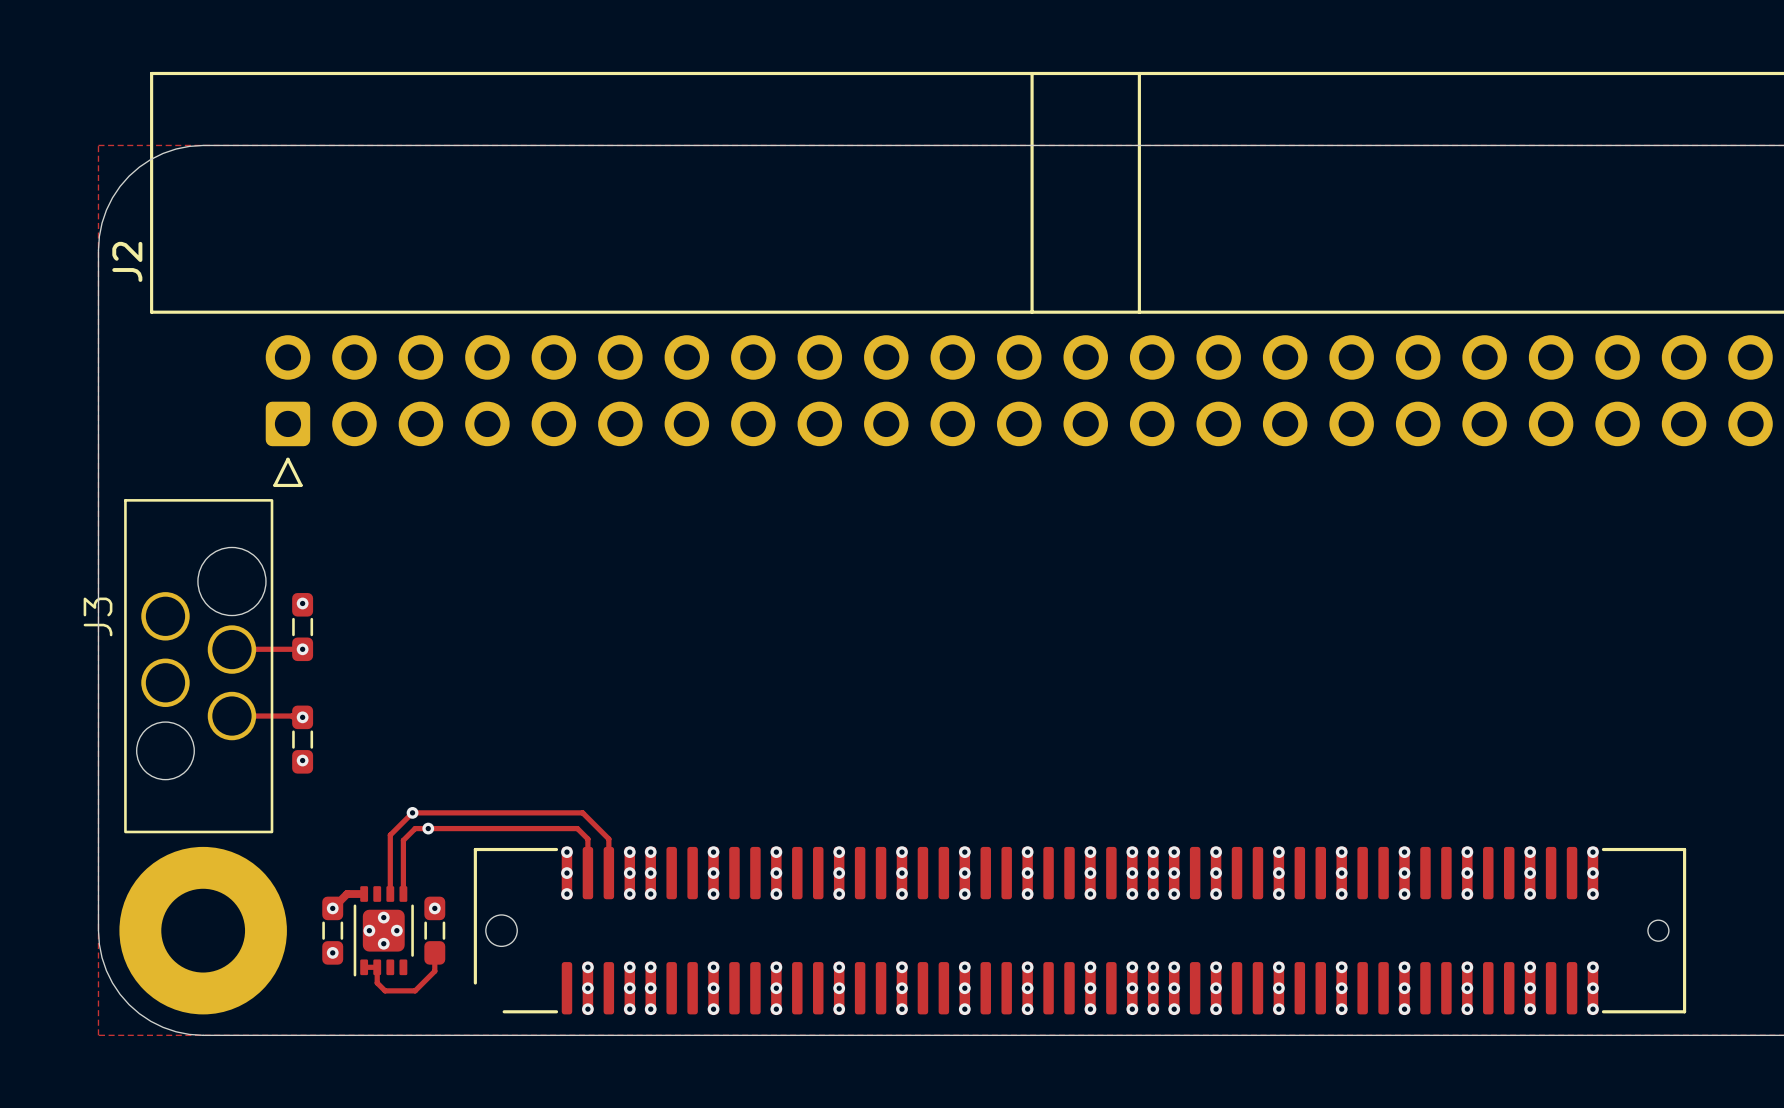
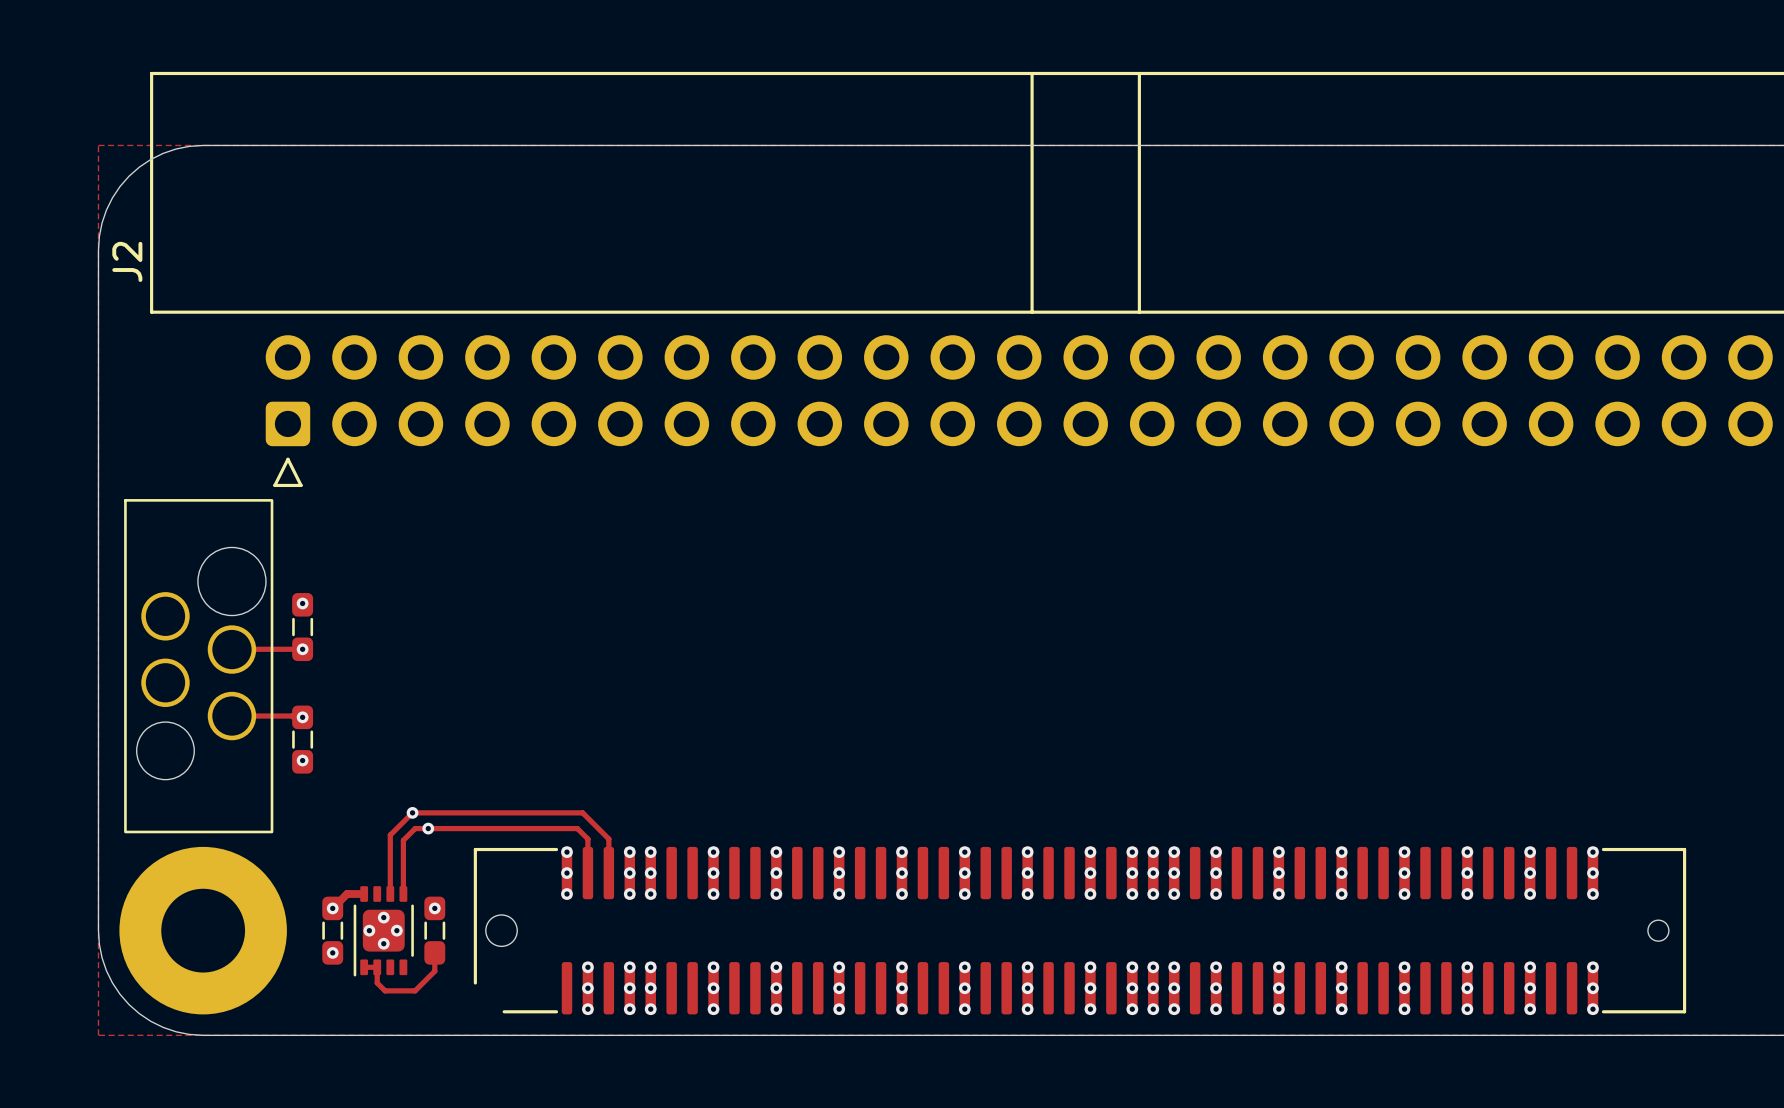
J3 name: J3 (98, 616) -> none

